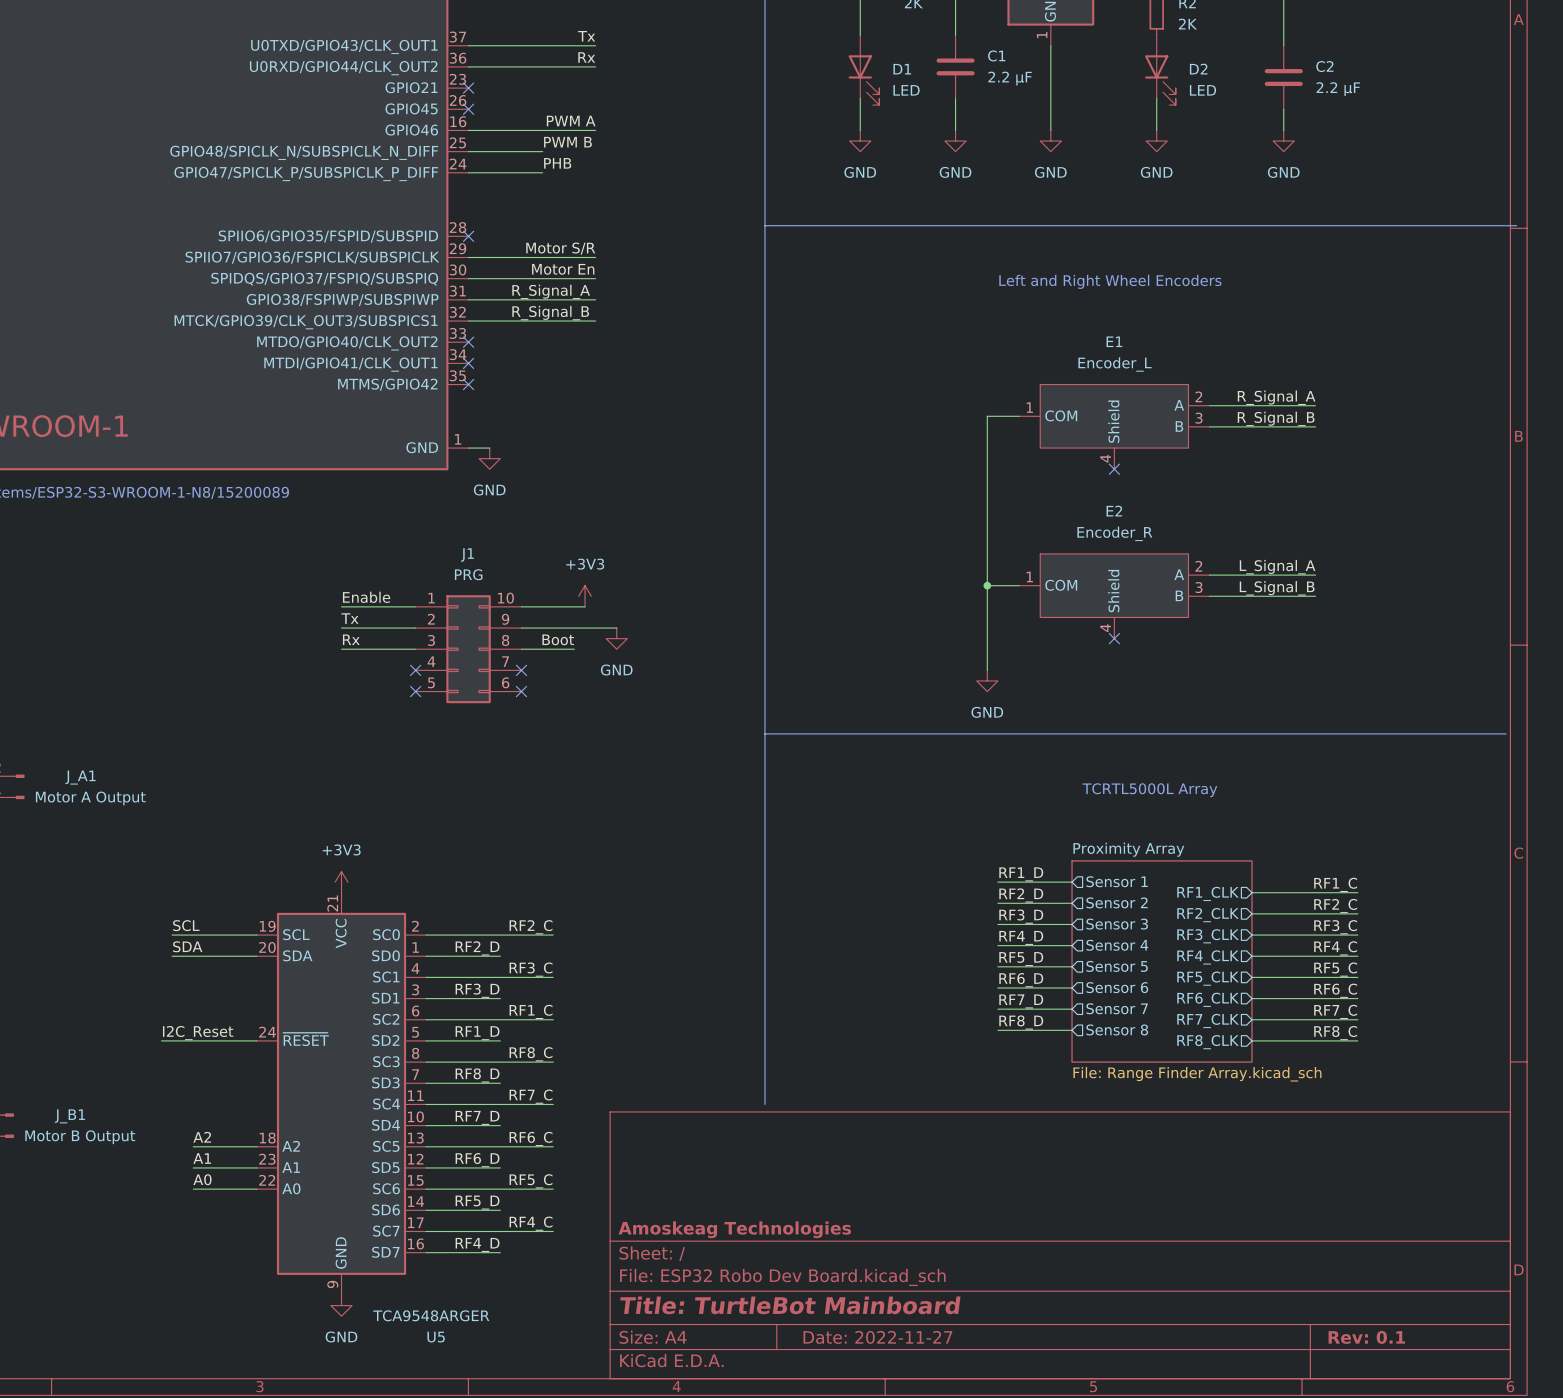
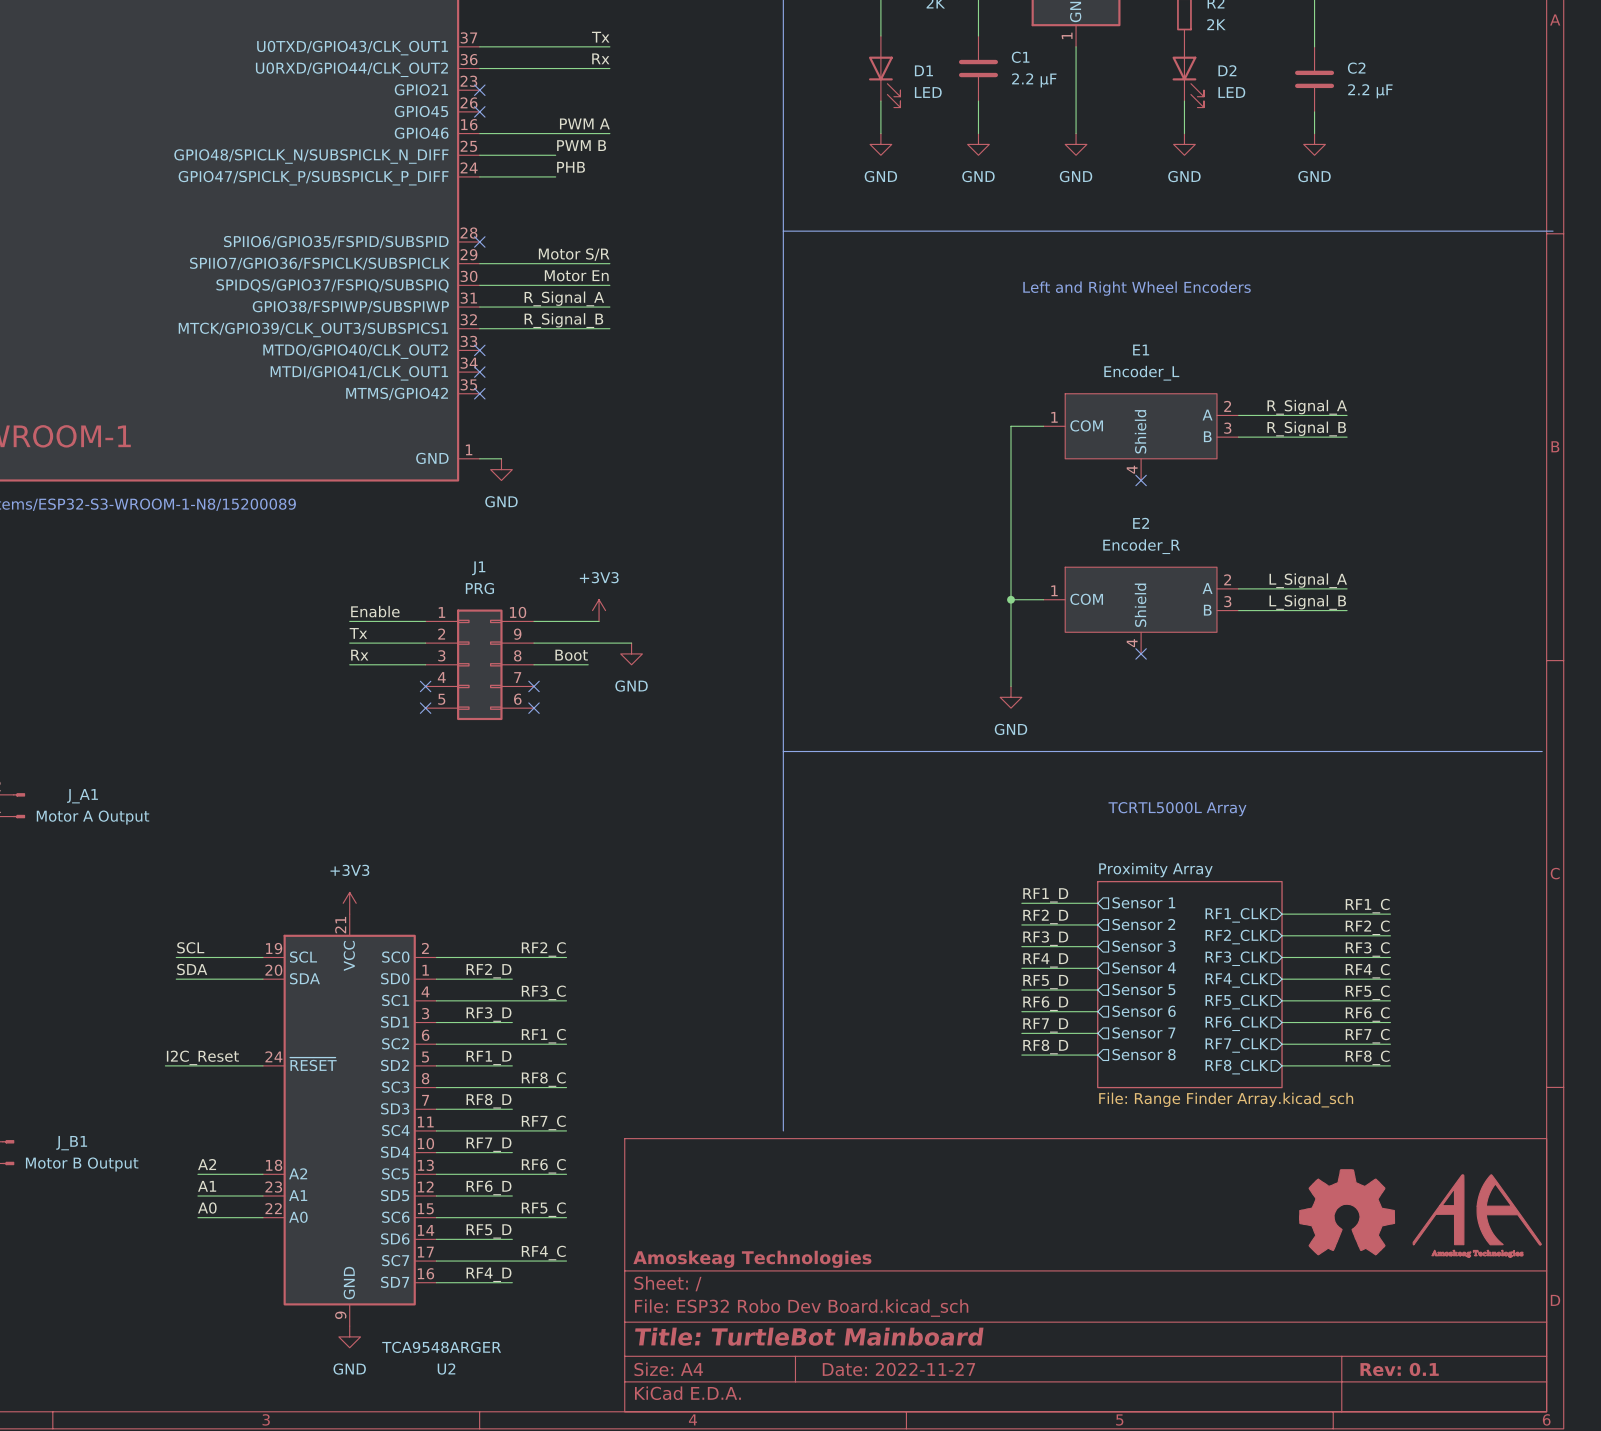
power symbol: none -> (1347, 1212)
power symbol: none -> (1477, 1215)
U5 name: U5 (436, 1337) -> U2 (446, 1369)

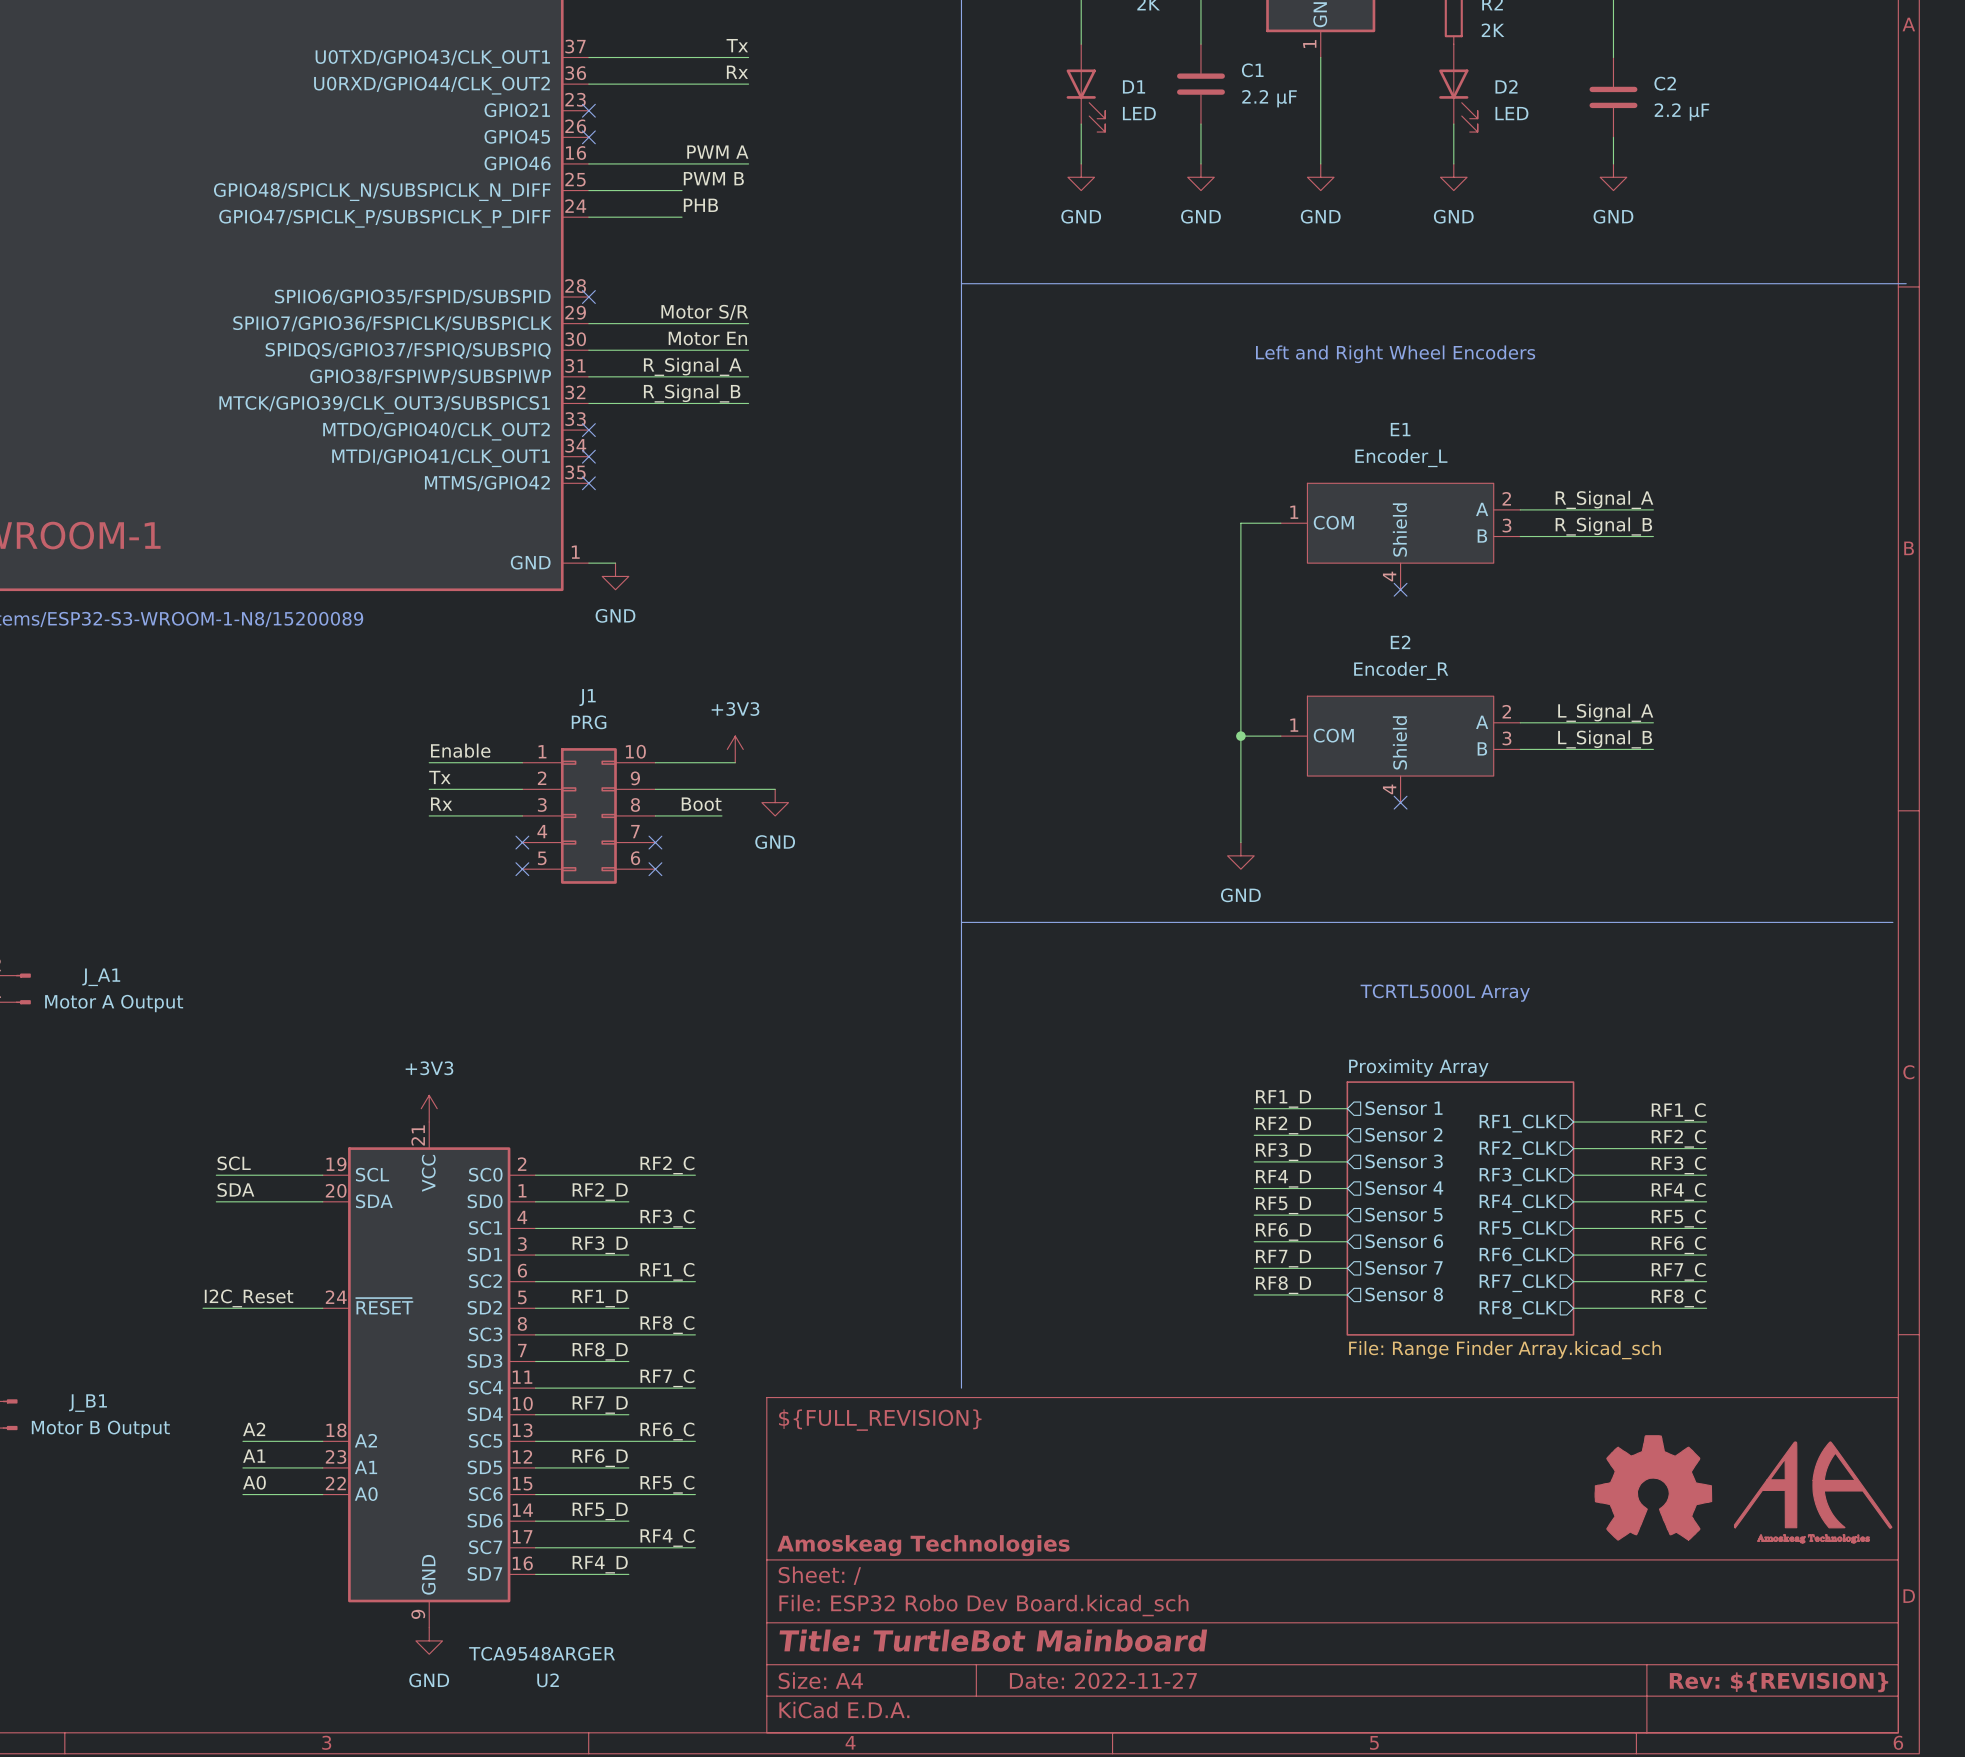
title block: none -> ${FULL_REVISION} (880, 1420)
title block: Rev: 0.1 (1399, 1369) -> Rev: ${REVISION} (1779, 1682)

